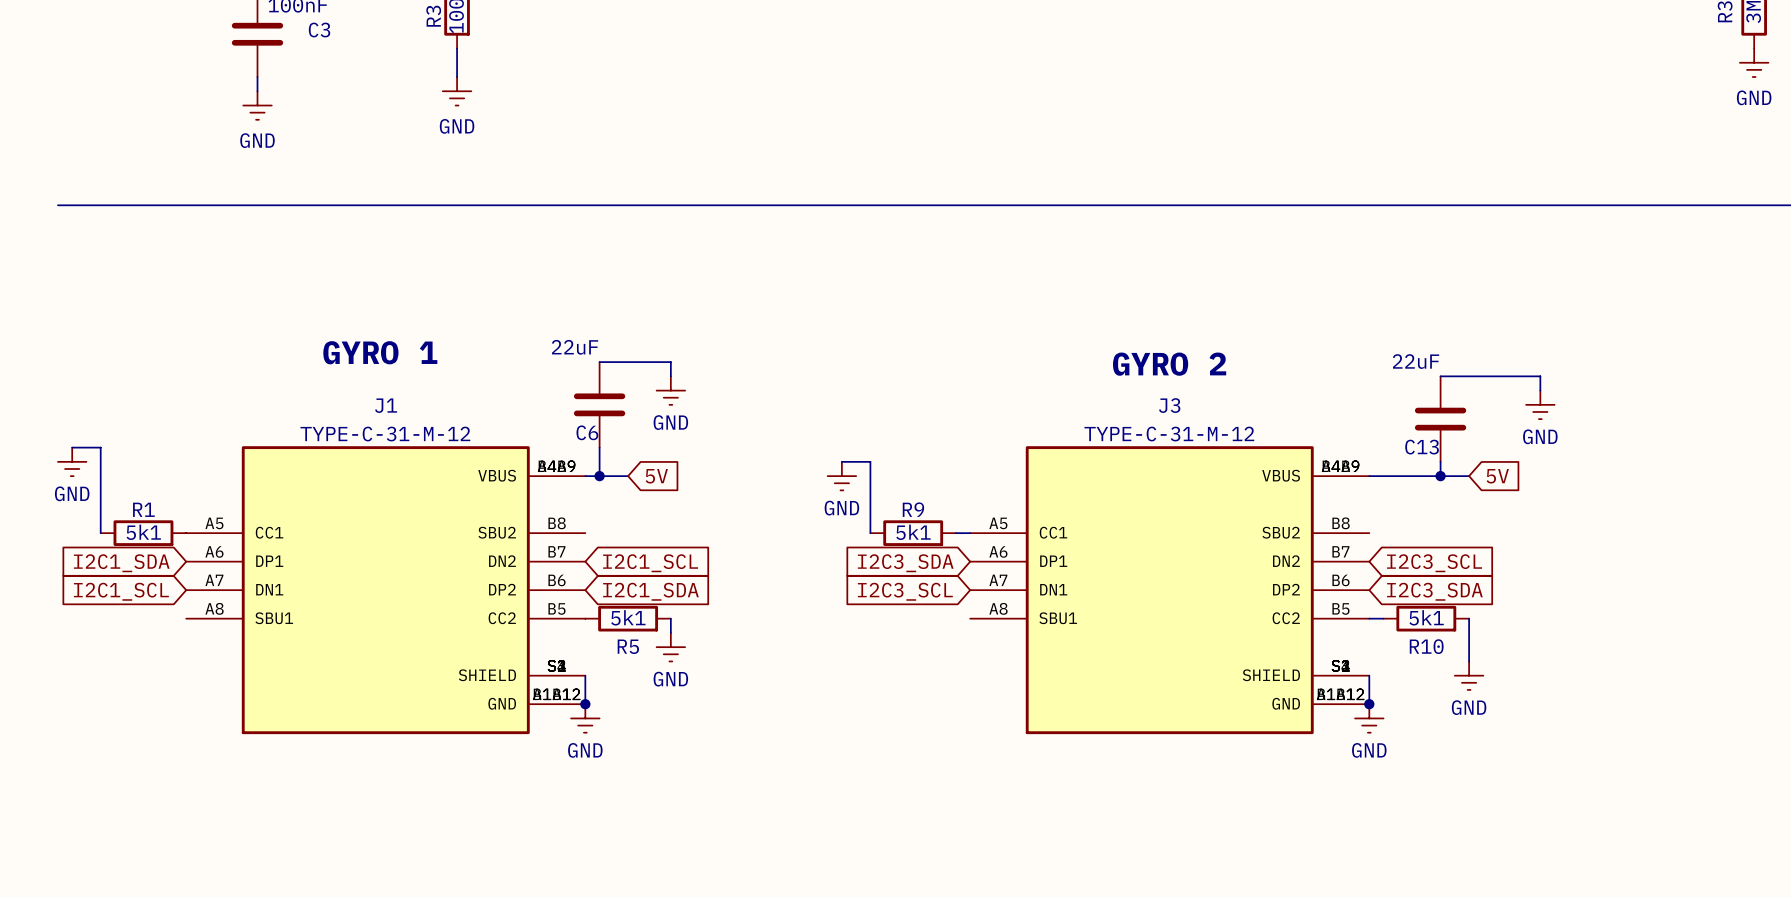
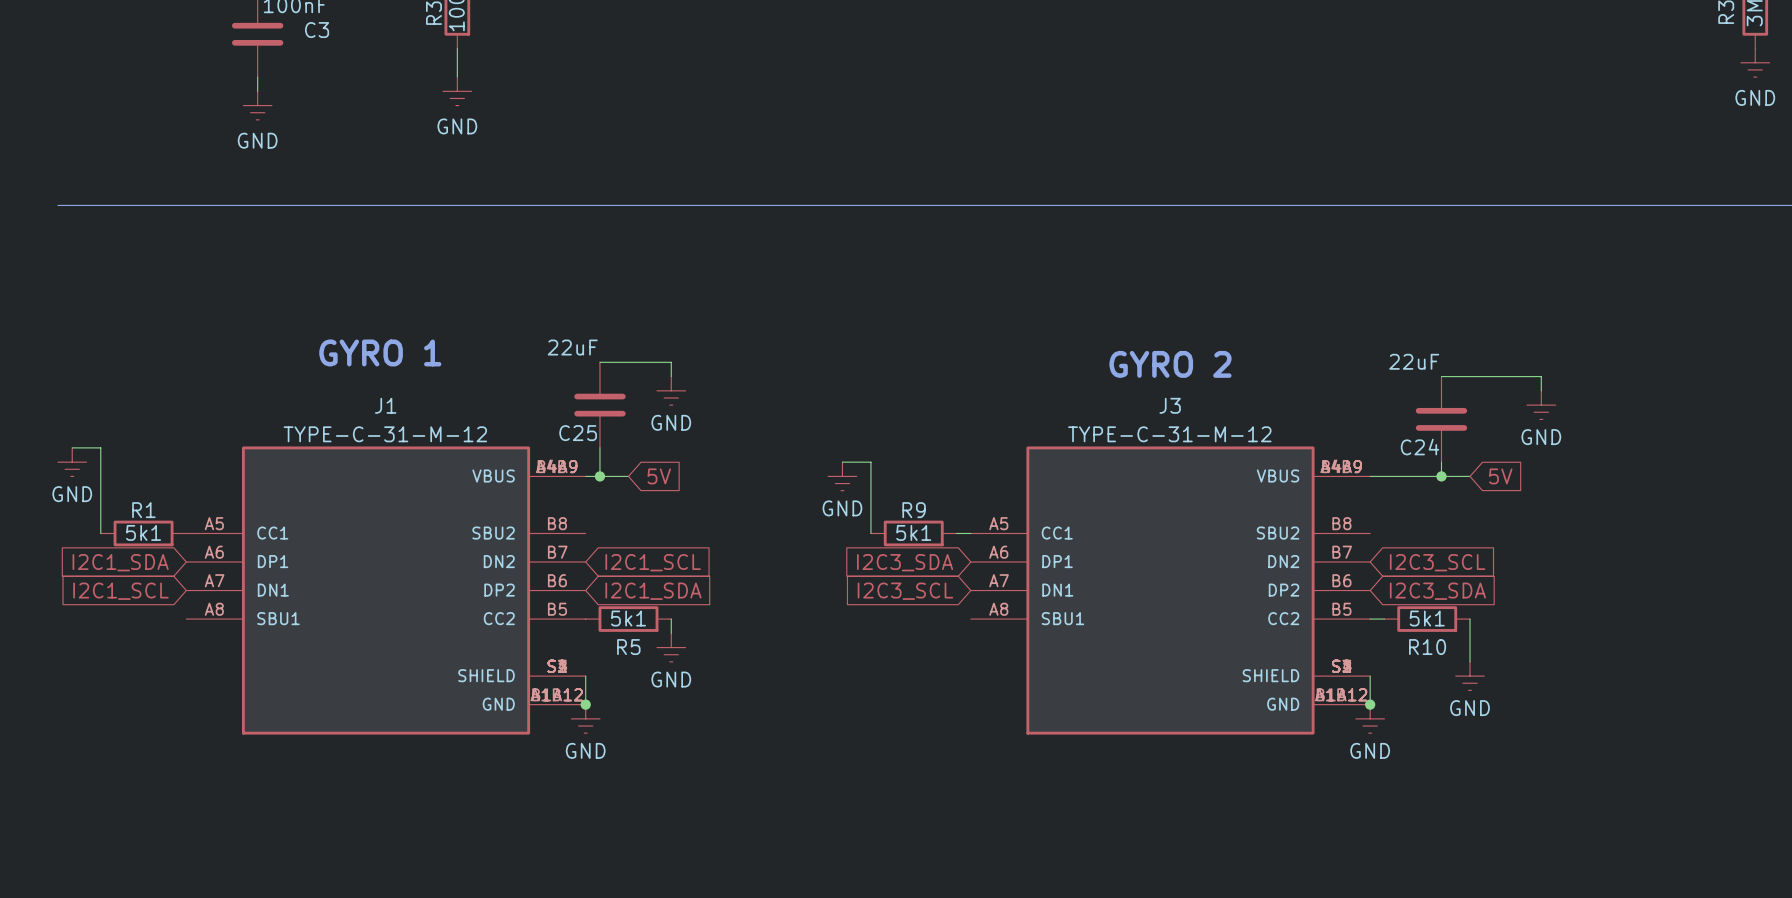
C6 name: C6 (587, 432) -> C25 (578, 433)
C13 name: C13 (1422, 447) -> C24 (1419, 447)

